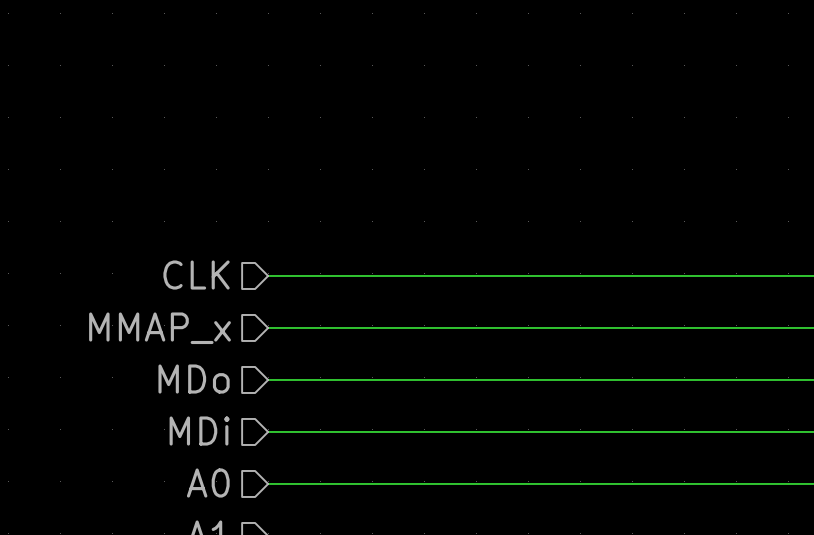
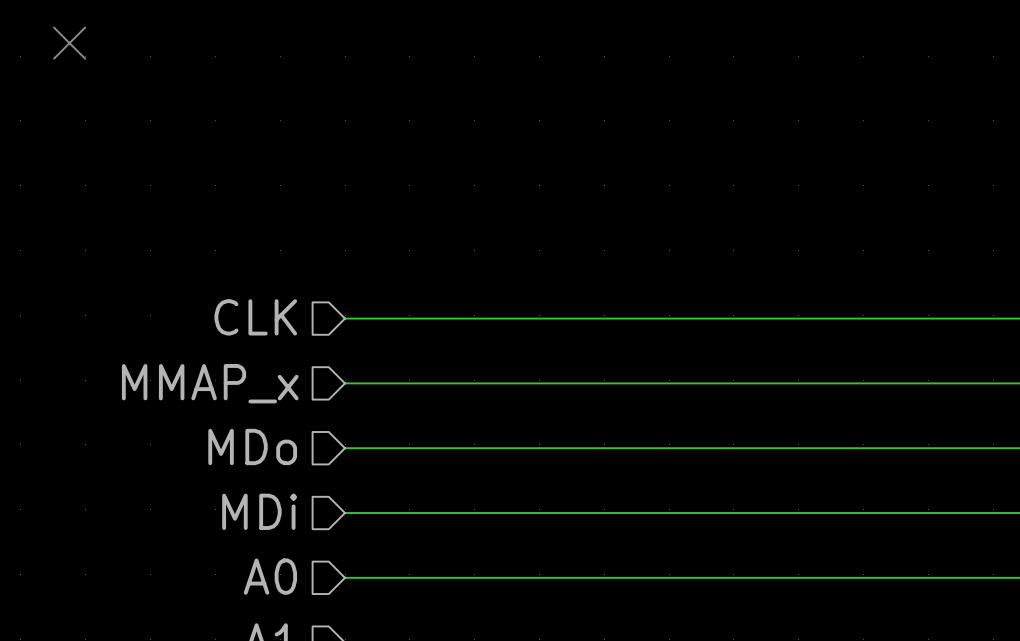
no-connect mark: none -> (69, 43)

